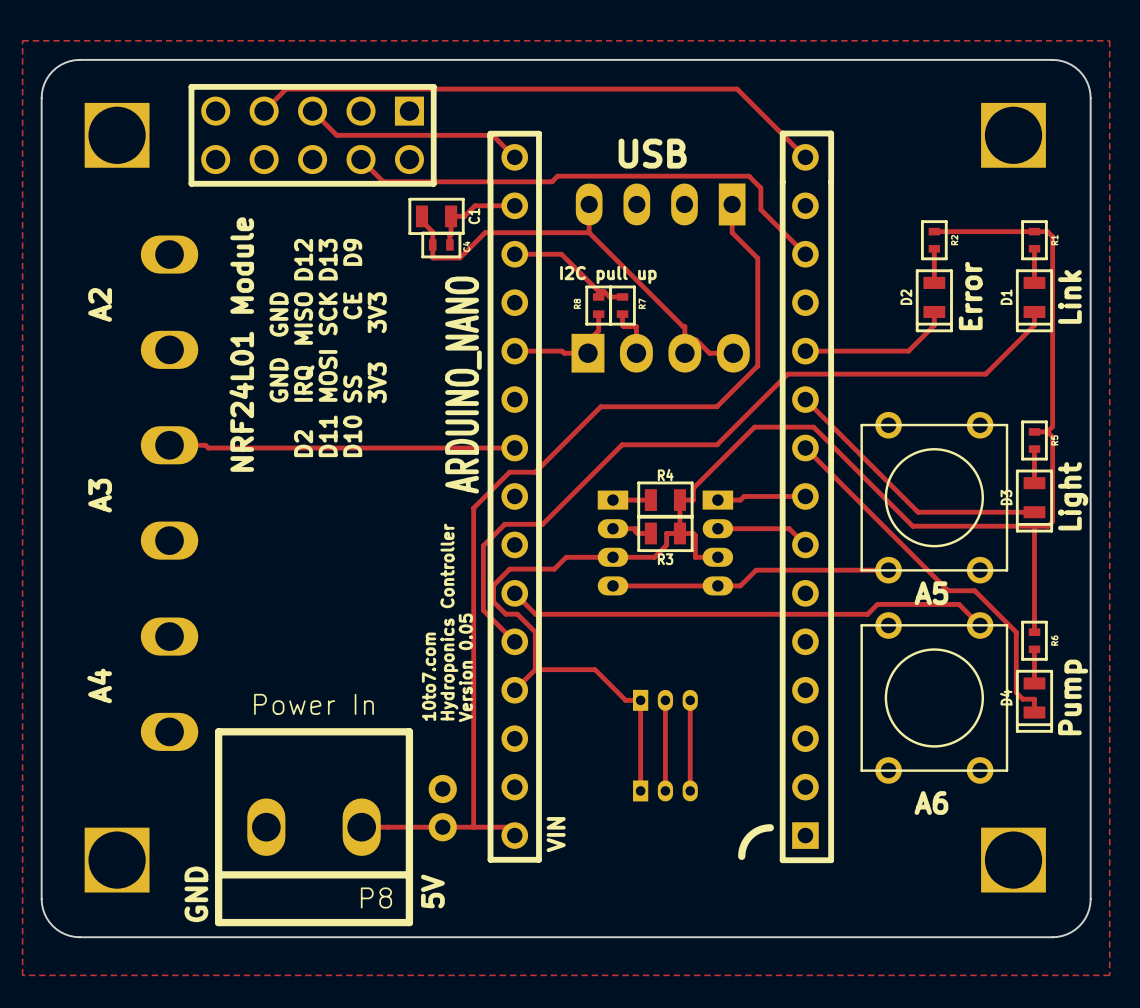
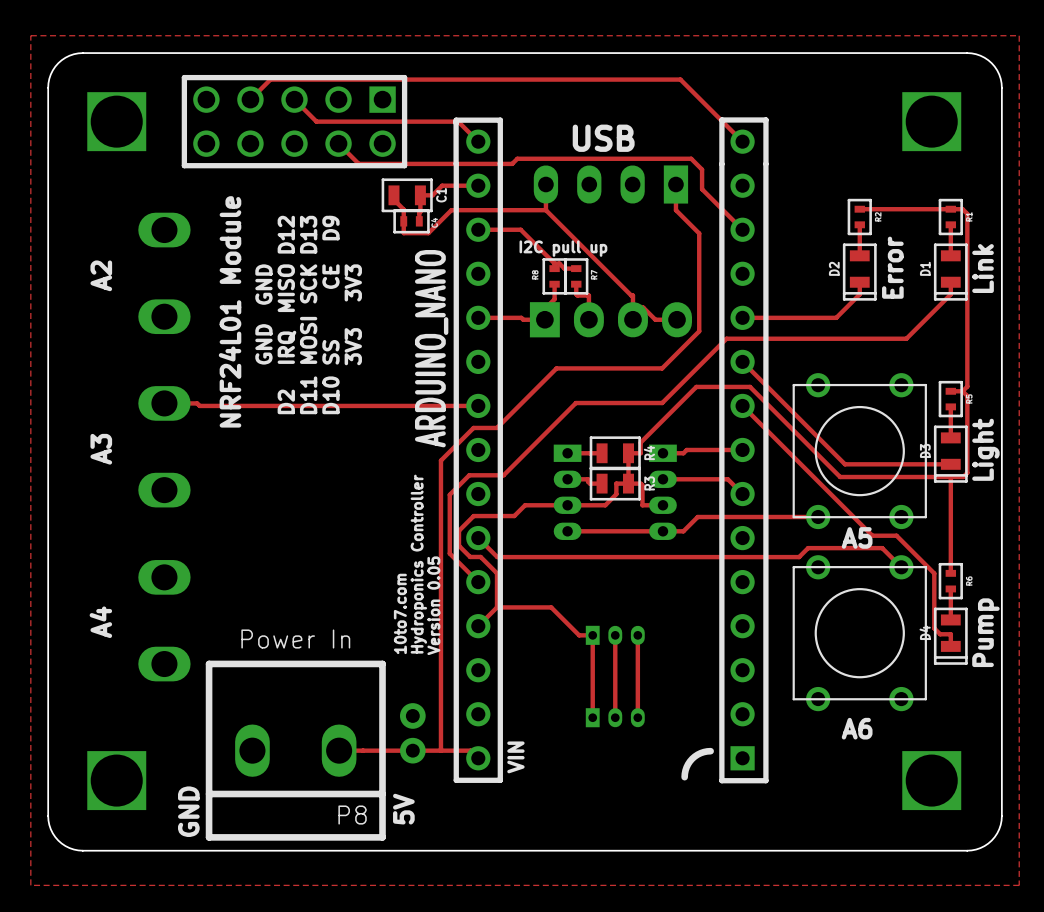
R4 name rotation: 0° (665, 475) -> 90° counterclockwise (649, 452)
R4 name position: R4 (665, 475) -> R4 (649, 452)
R3 name rotation: 0° (665, 559) -> 90° counterclockwise (649, 483)
R3 name position: R3 (665, 559) -> R3 (649, 483)

